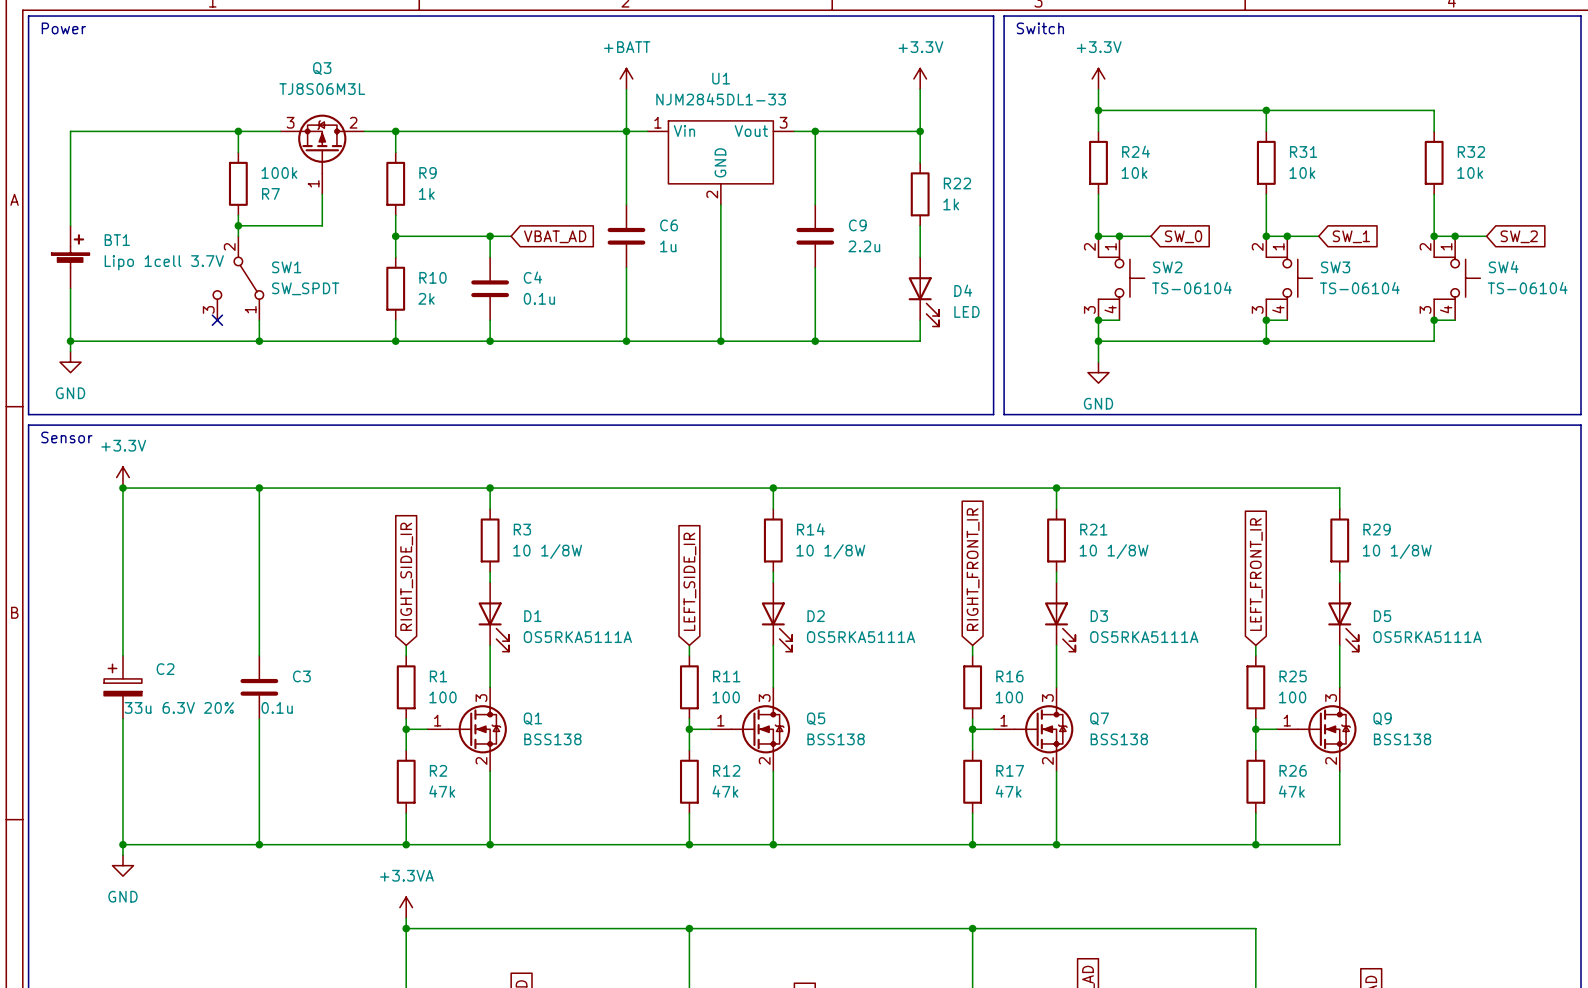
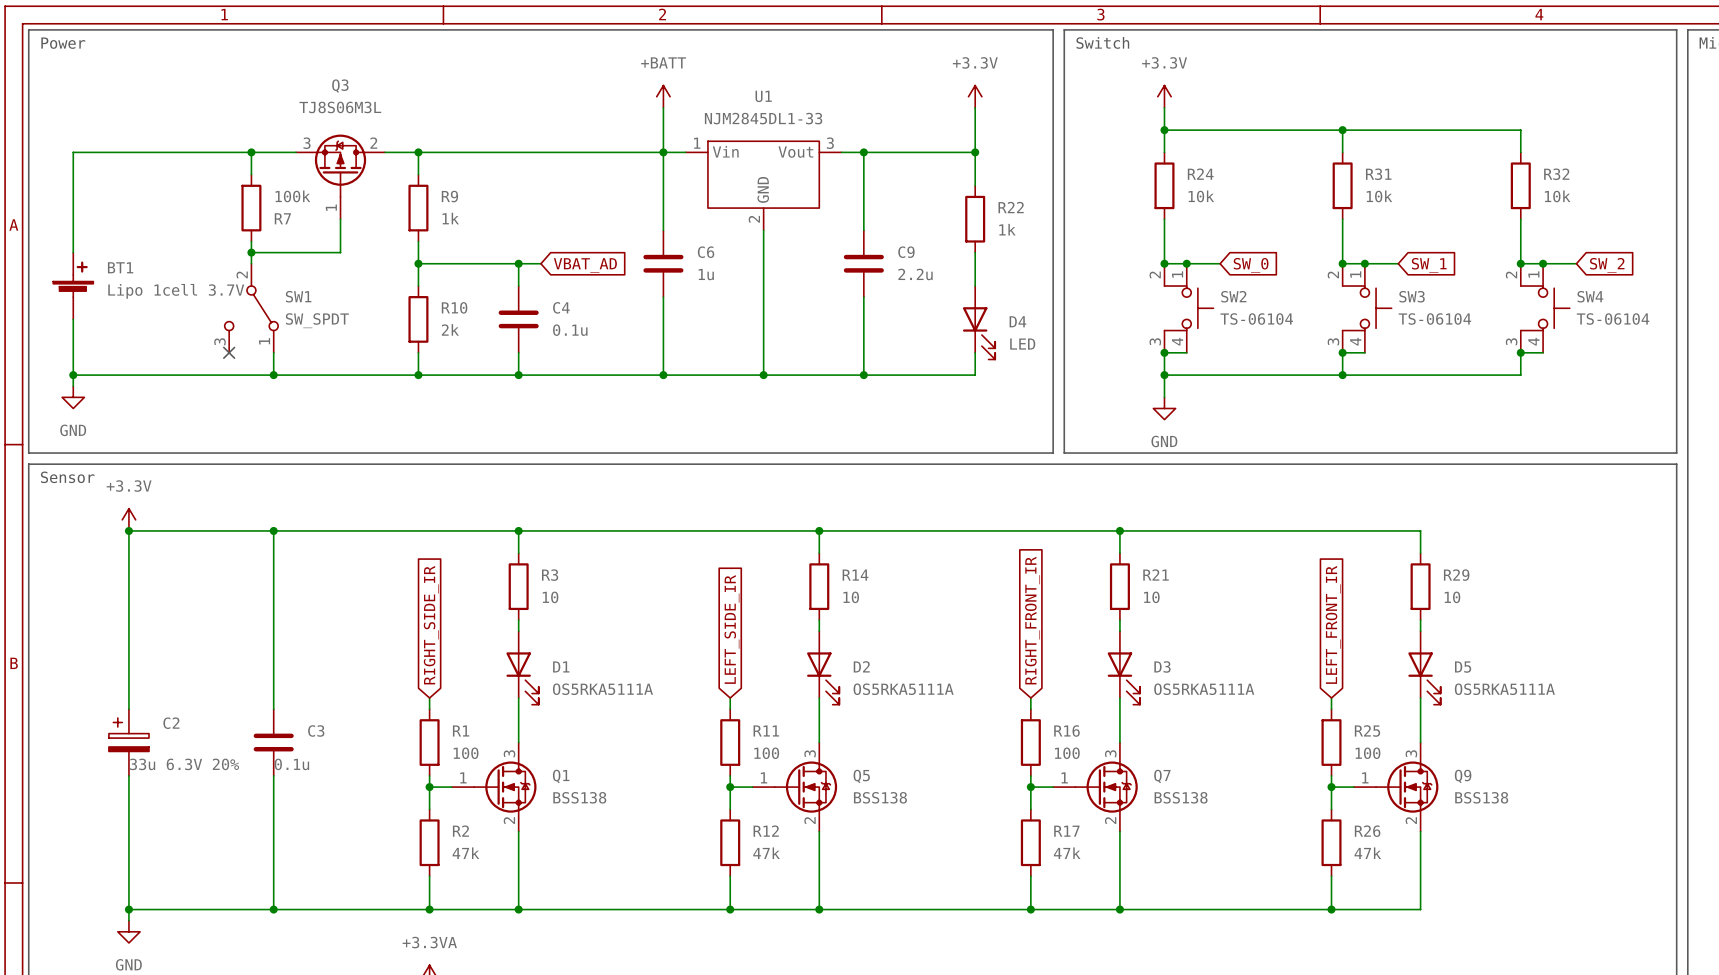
R3 value: 10 1/8W (547, 551) -> 10 (550, 597)
R14 value: 10 1/8W (830, 551) -> 10 (851, 597)
R21 value: 10 1/8W (1114, 551) -> 10 (1151, 597)
R29 value: 10 1/8W (1397, 551) -> 10 (1452, 597)

